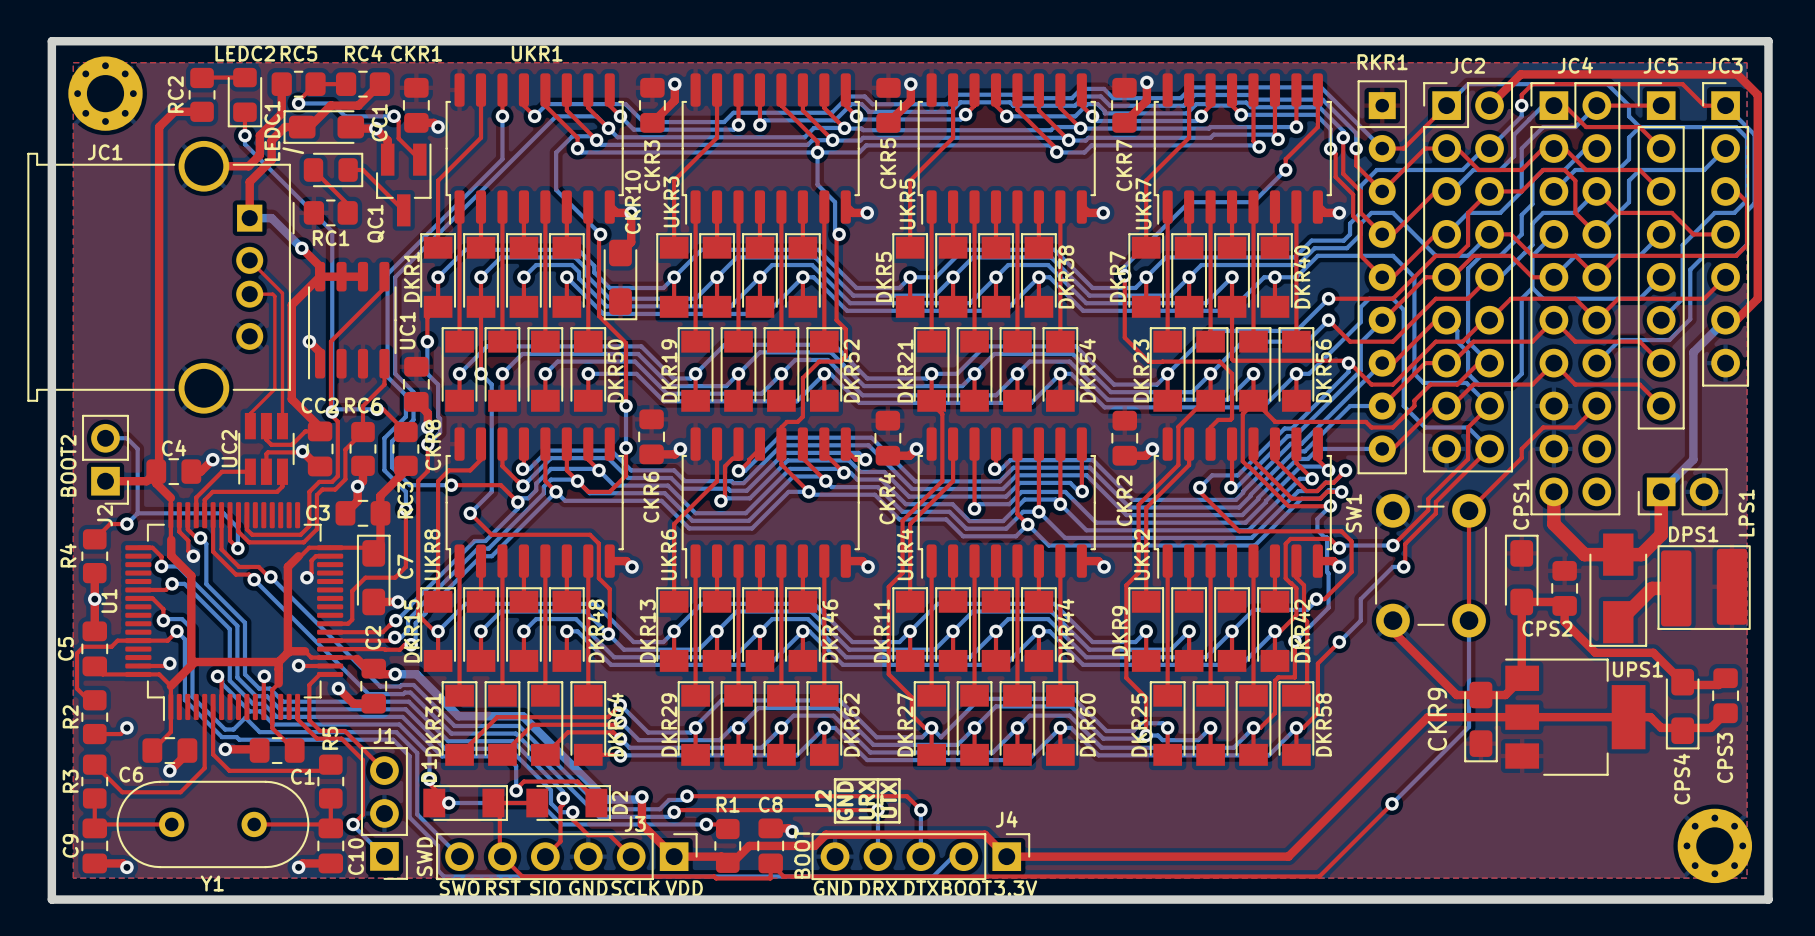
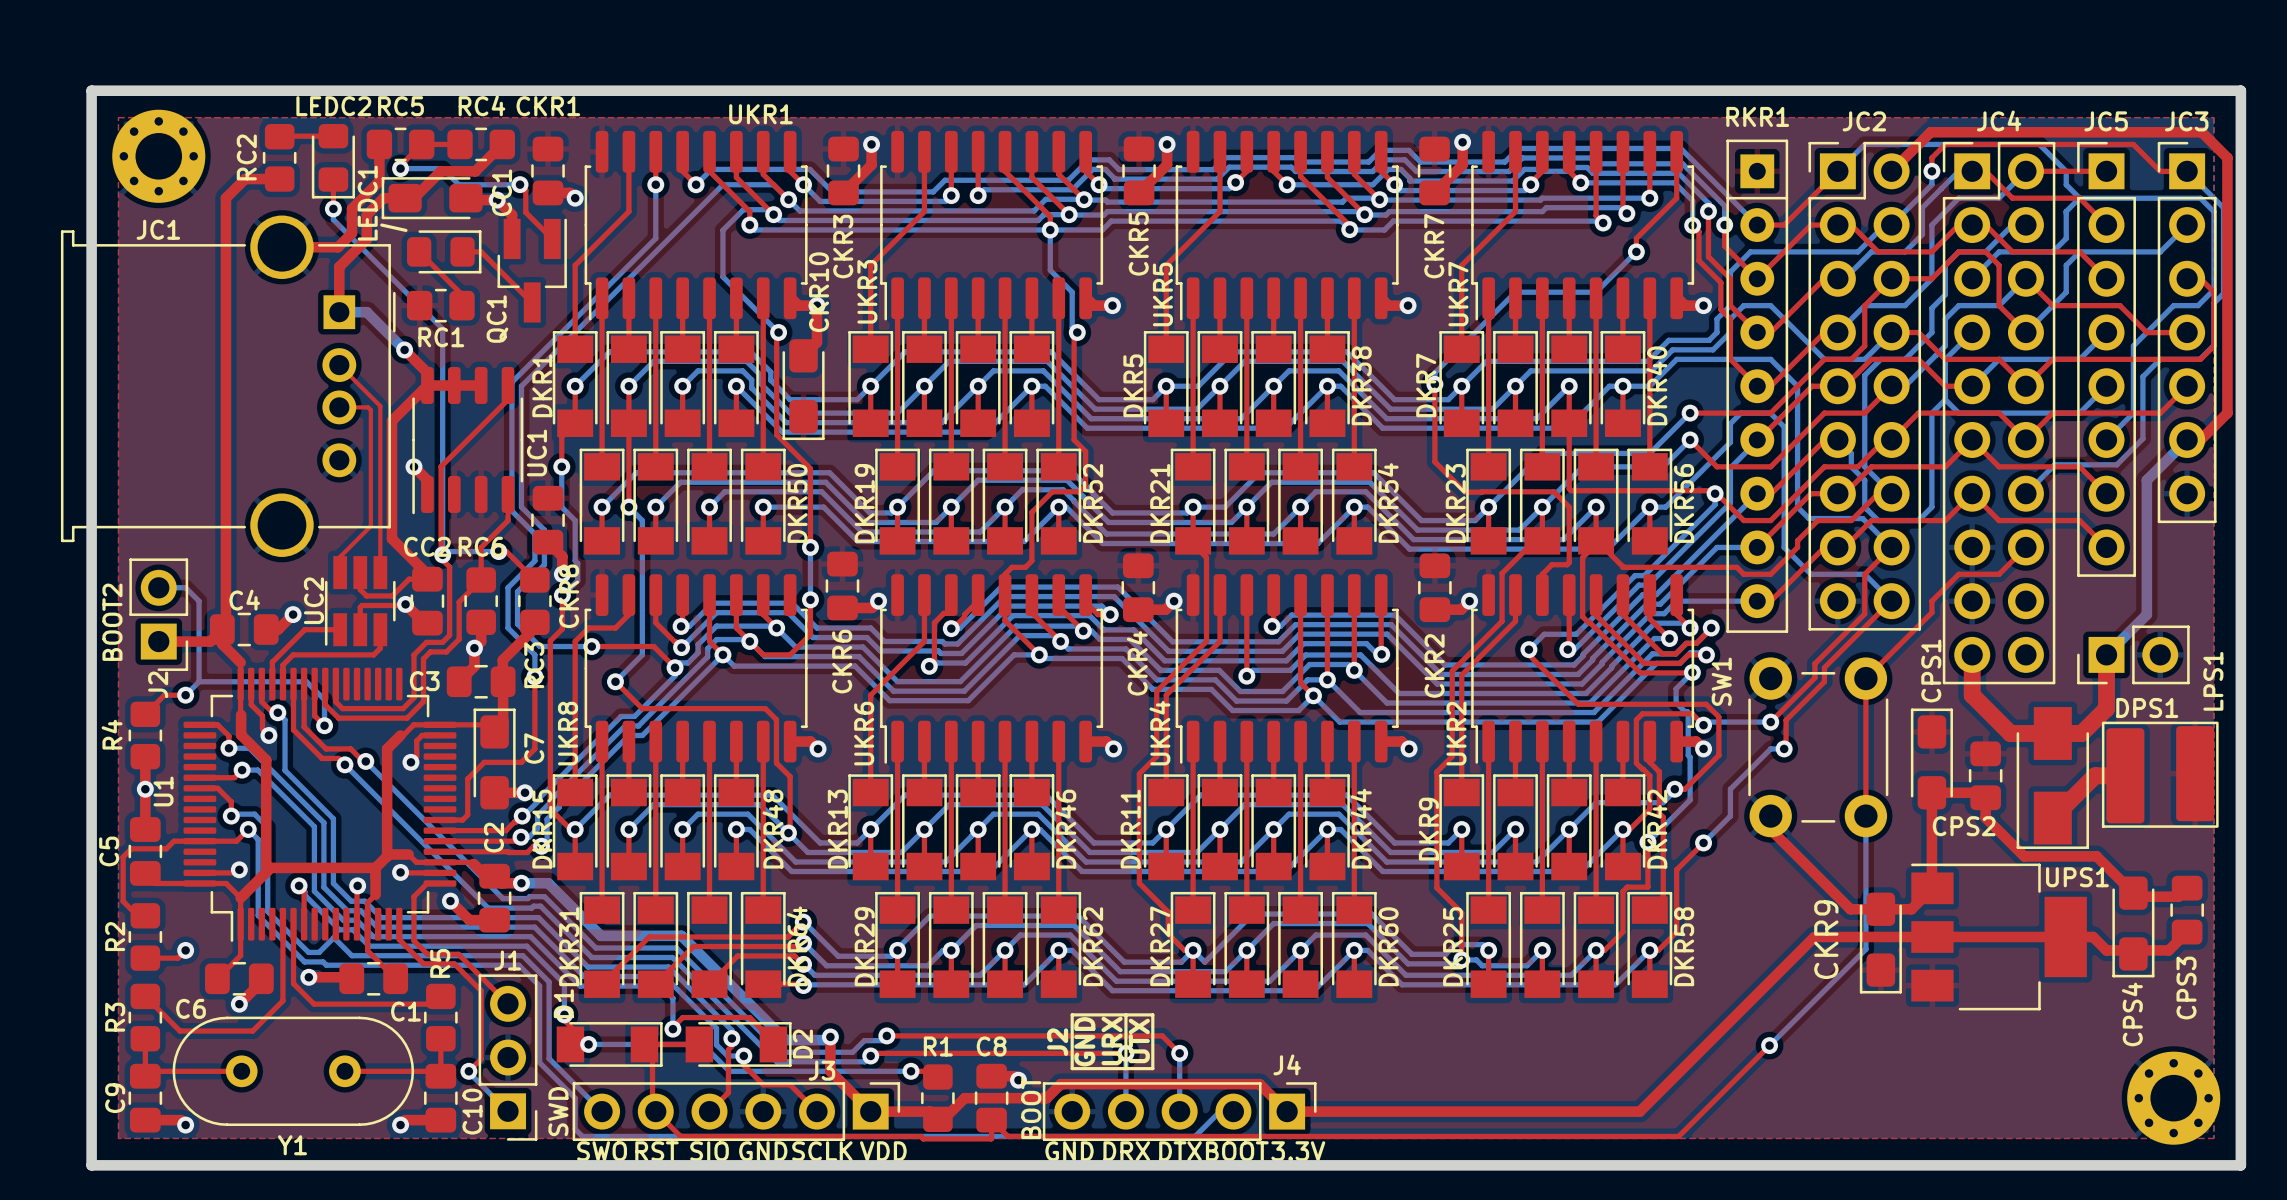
UKR1 name position: UKR1 (537, 53) -> UKR1 (760, 114)

